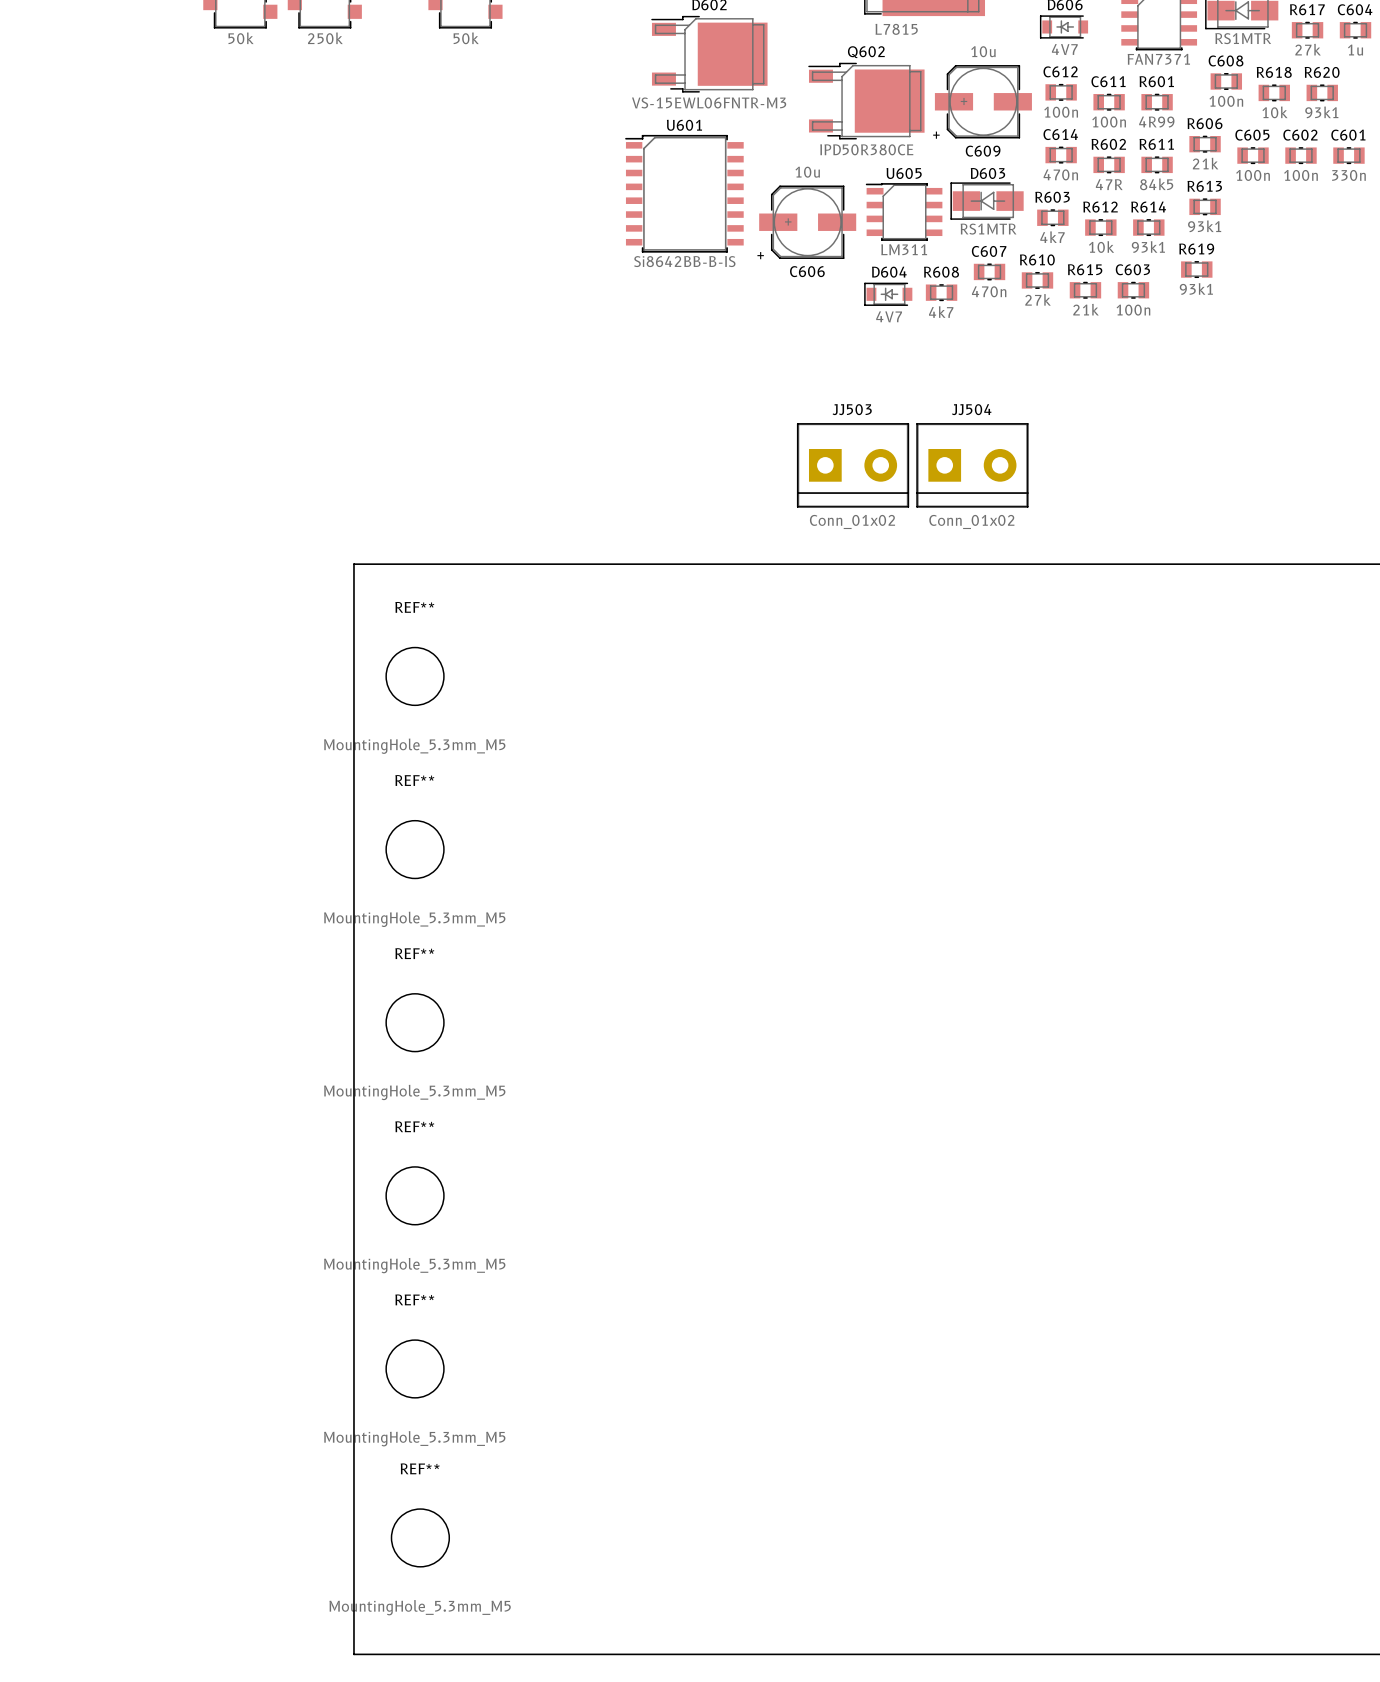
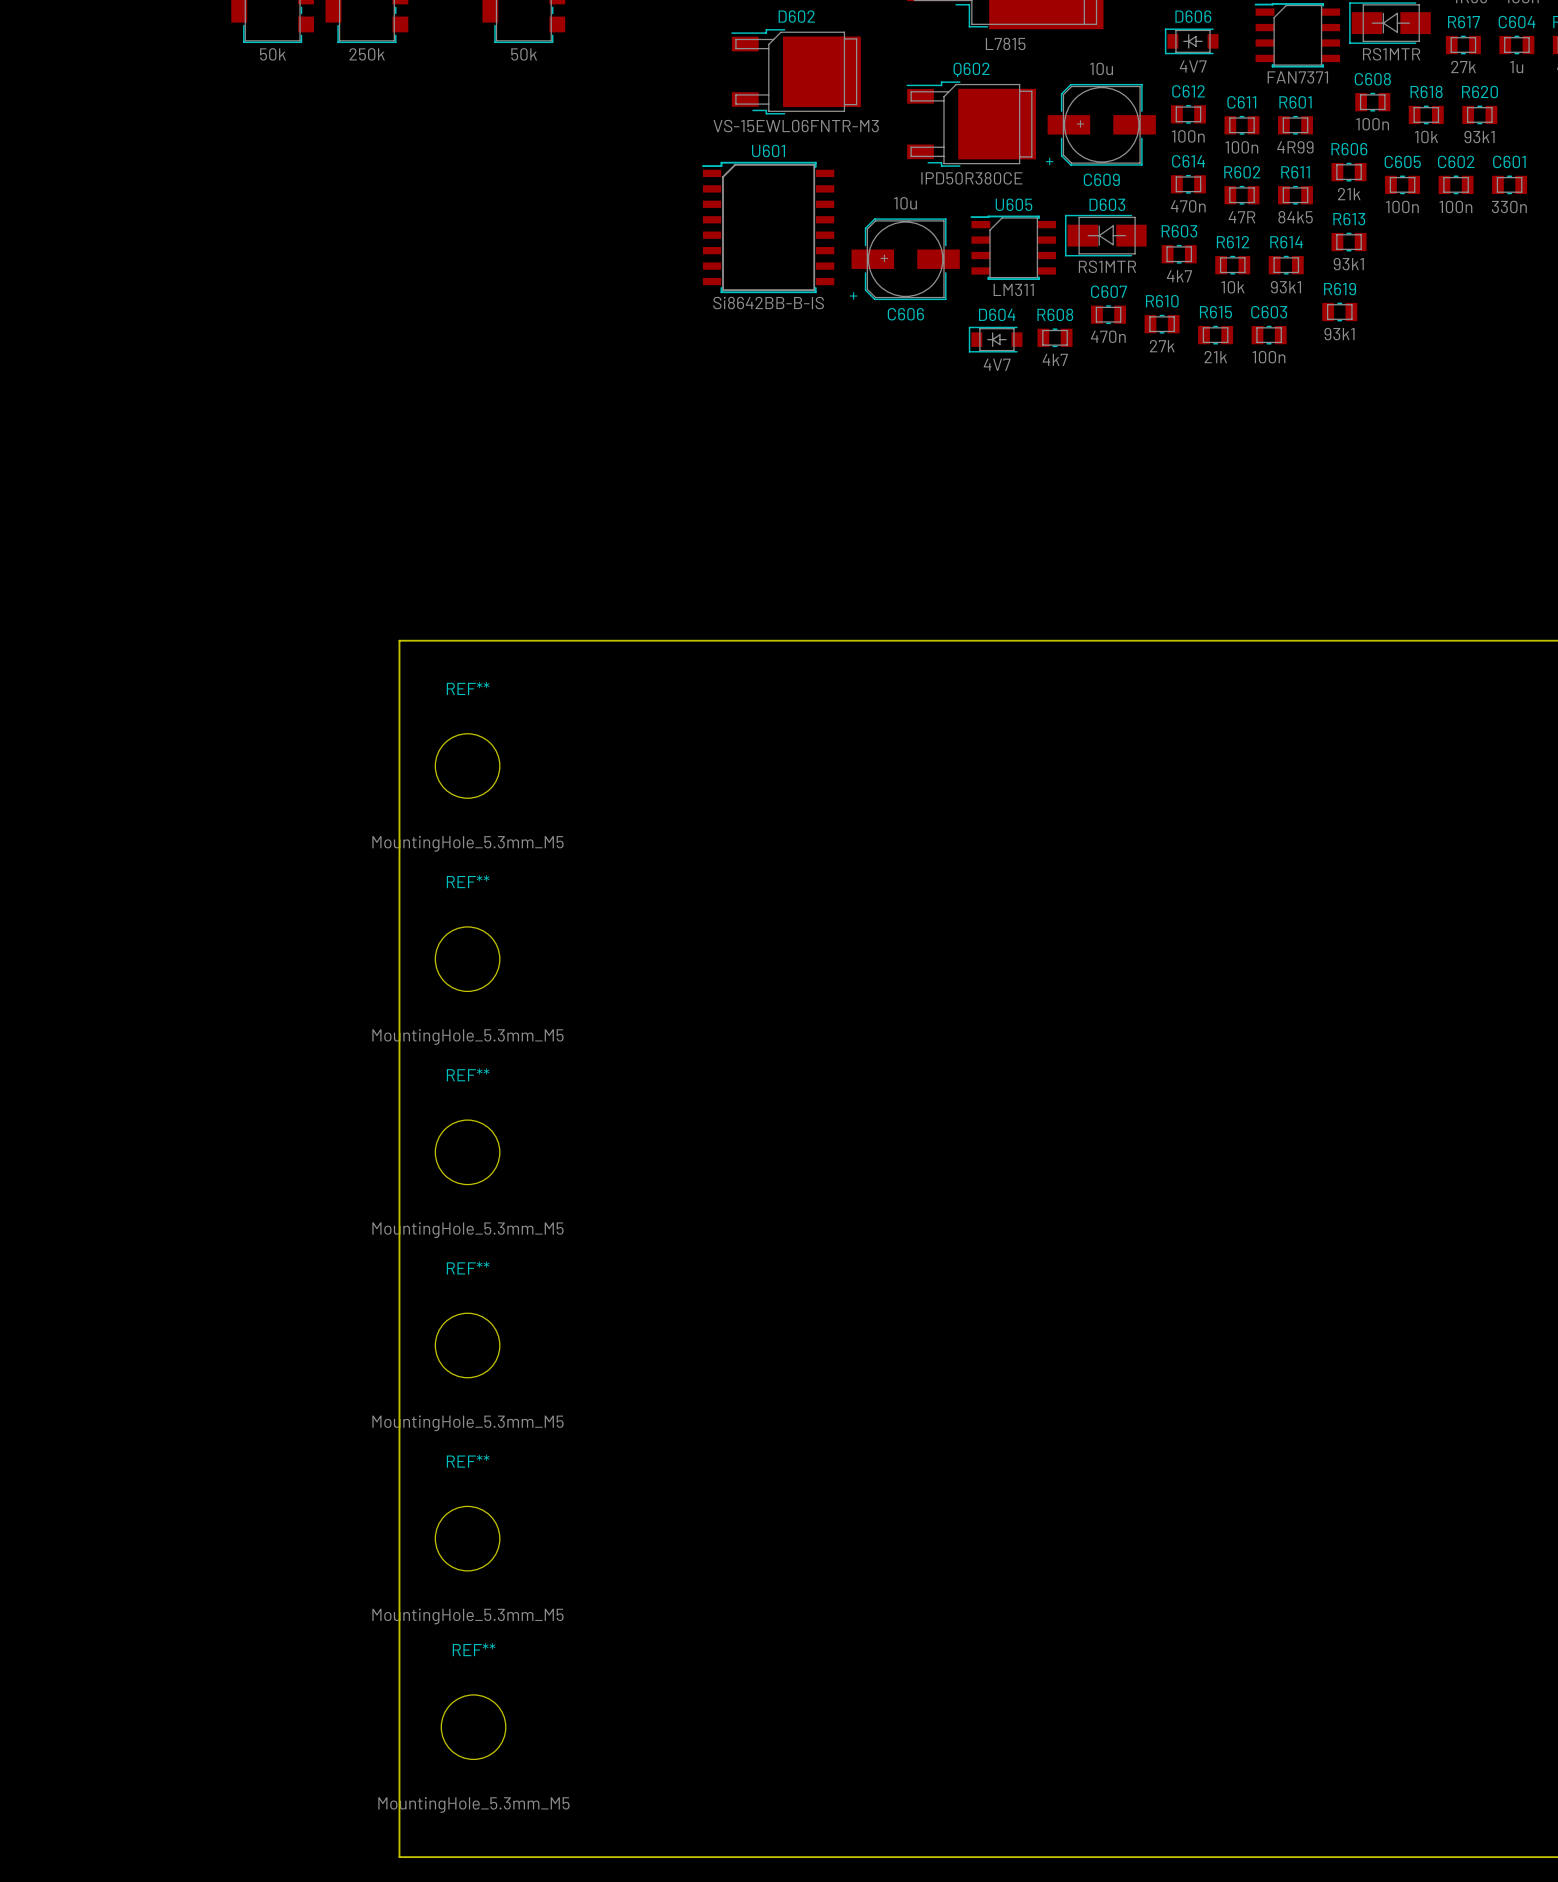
JJ503: Conn_01x02 (853, 465) -> none
JJ504: Conn_01x02 (972, 465) -> none

